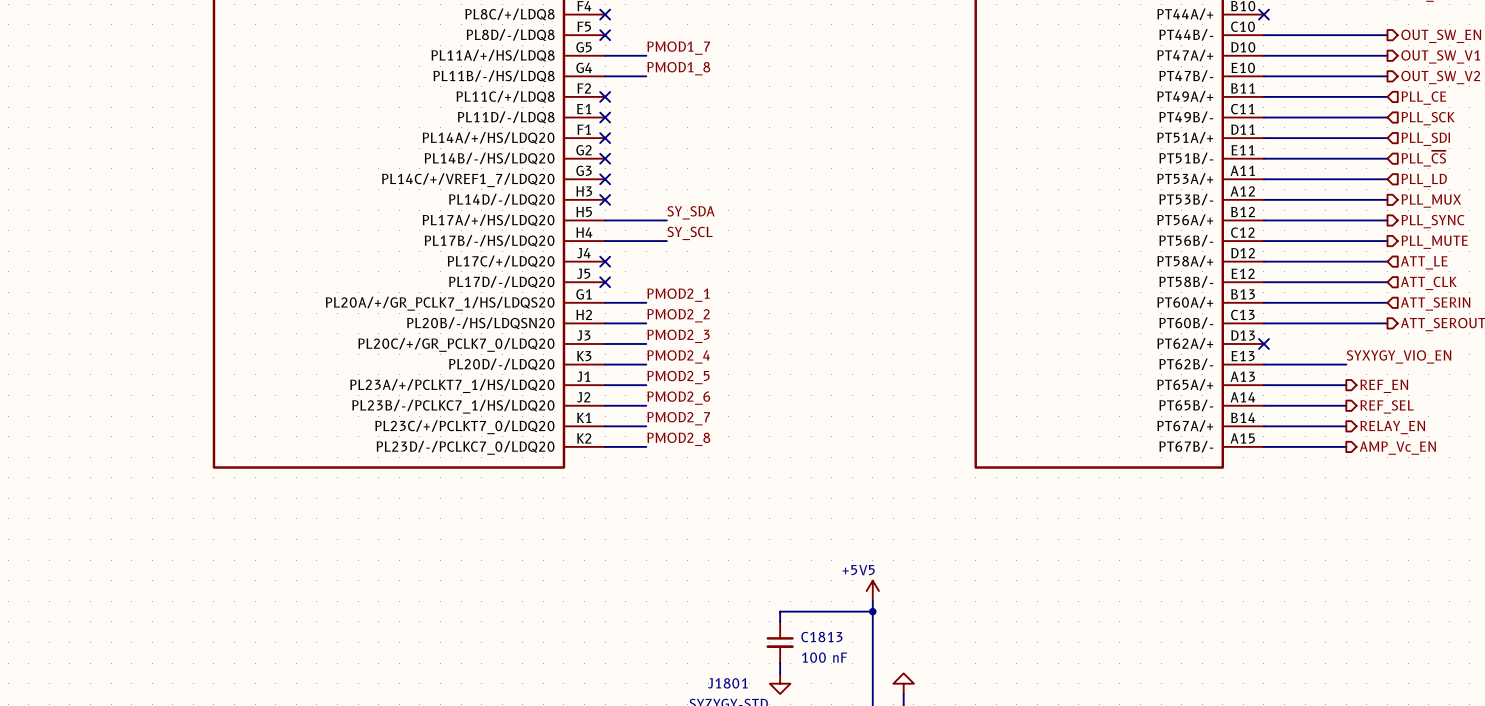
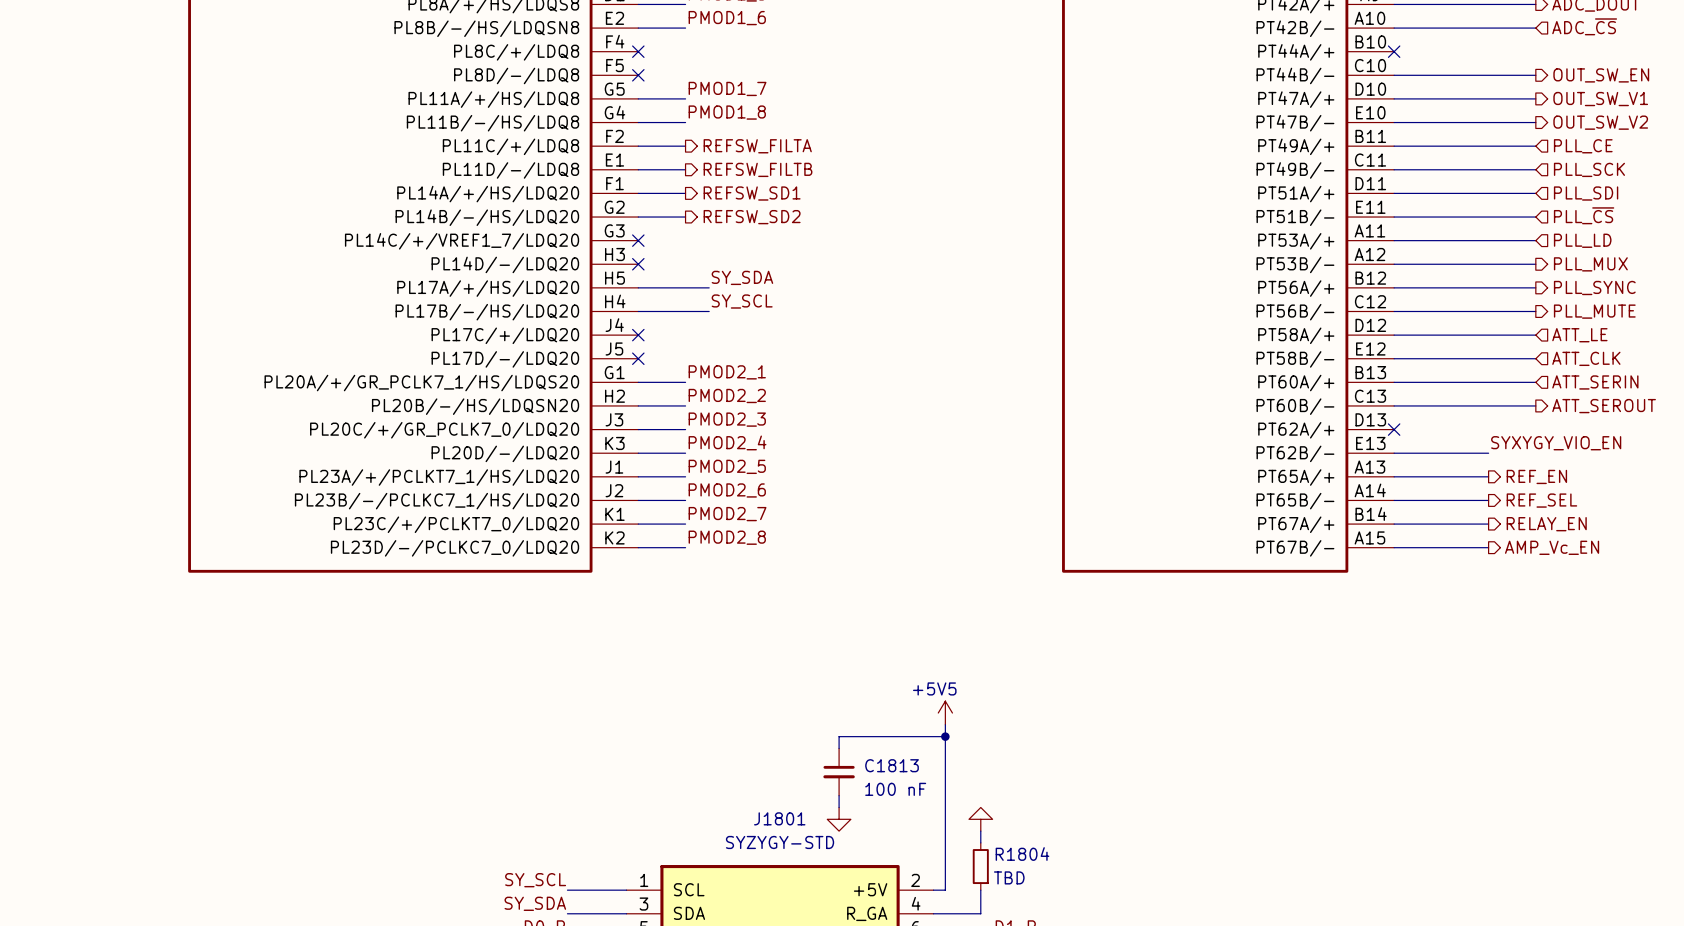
wire: none -> (638, 146) (685, 146)
no-connect mark: (605, 96) -> none
hierarchical label: none -> REFSW_FILTA (757, 146)
wire: none -> (638, 169) (685, 169)
no-connect mark: (605, 117) -> none
hierarchical label: none -> REFSW_FILTB (758, 169)
wire: none -> (638, 193) (685, 193)
no-connect mark: (605, 138) -> none
hierarchical label: none -> REFSW_SD1 (752, 193)
wire: none -> (638, 217) (685, 217)
no-connect mark: (605, 158) -> none
hierarchical label: none -> REFSW_SD2 (752, 217)

